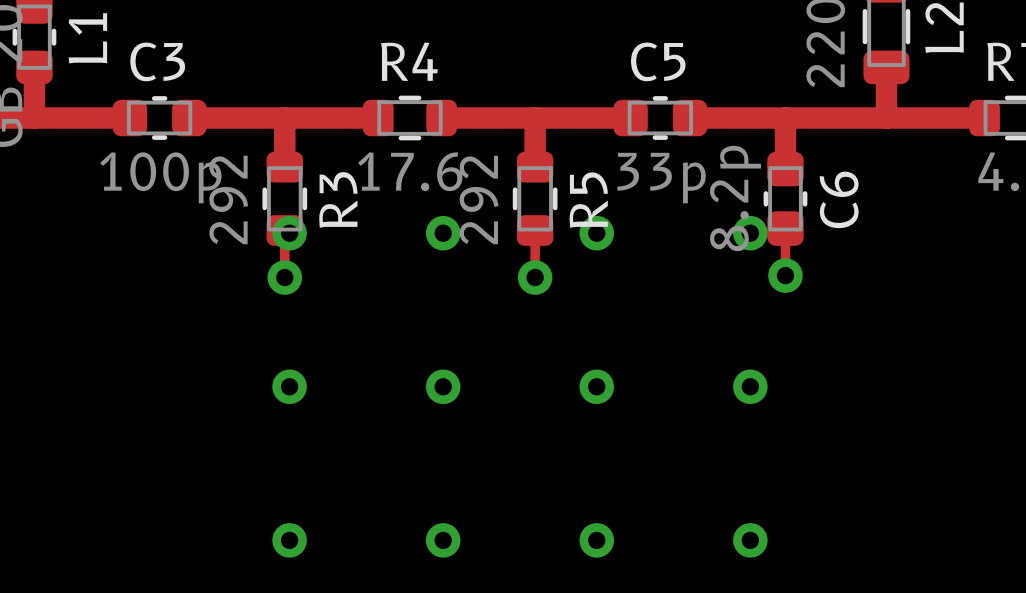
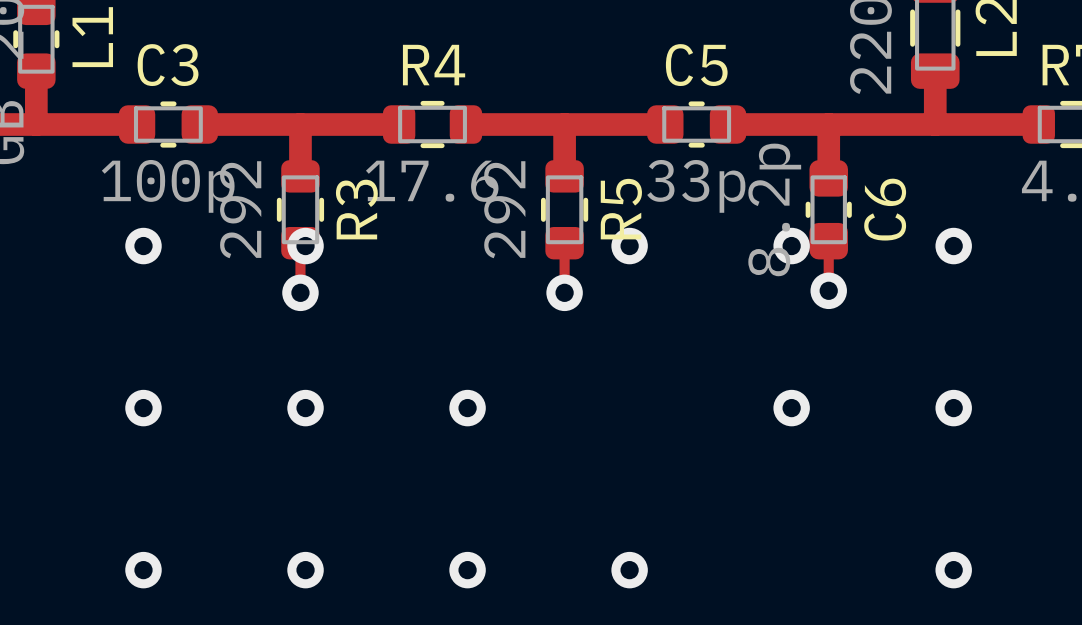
via: none -> (143, 246)
via: (443, 233) -> none
via: none -> (953, 246)
via: none -> (143, 408)
via: (596, 386) -> none
via: none -> (953, 408)
via: none -> (143, 570)
via: (750, 540) -> none
via: none -> (953, 570)

